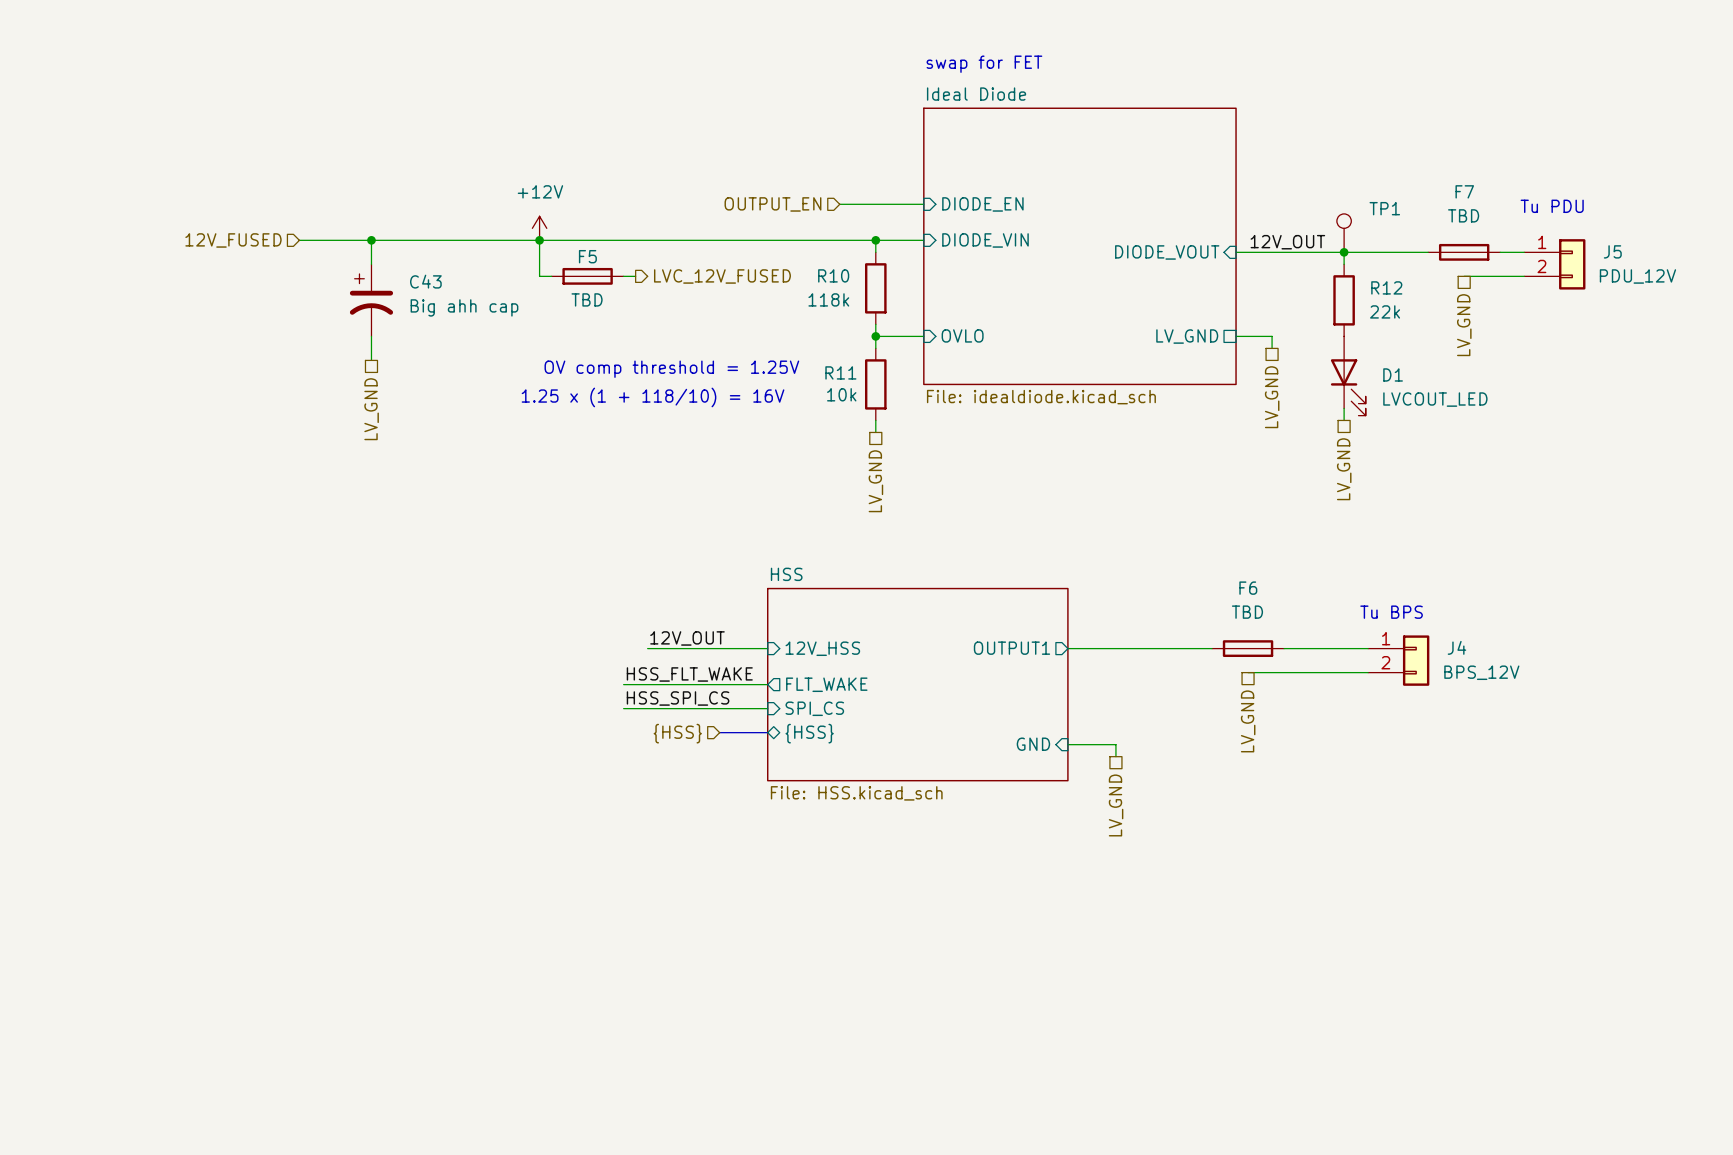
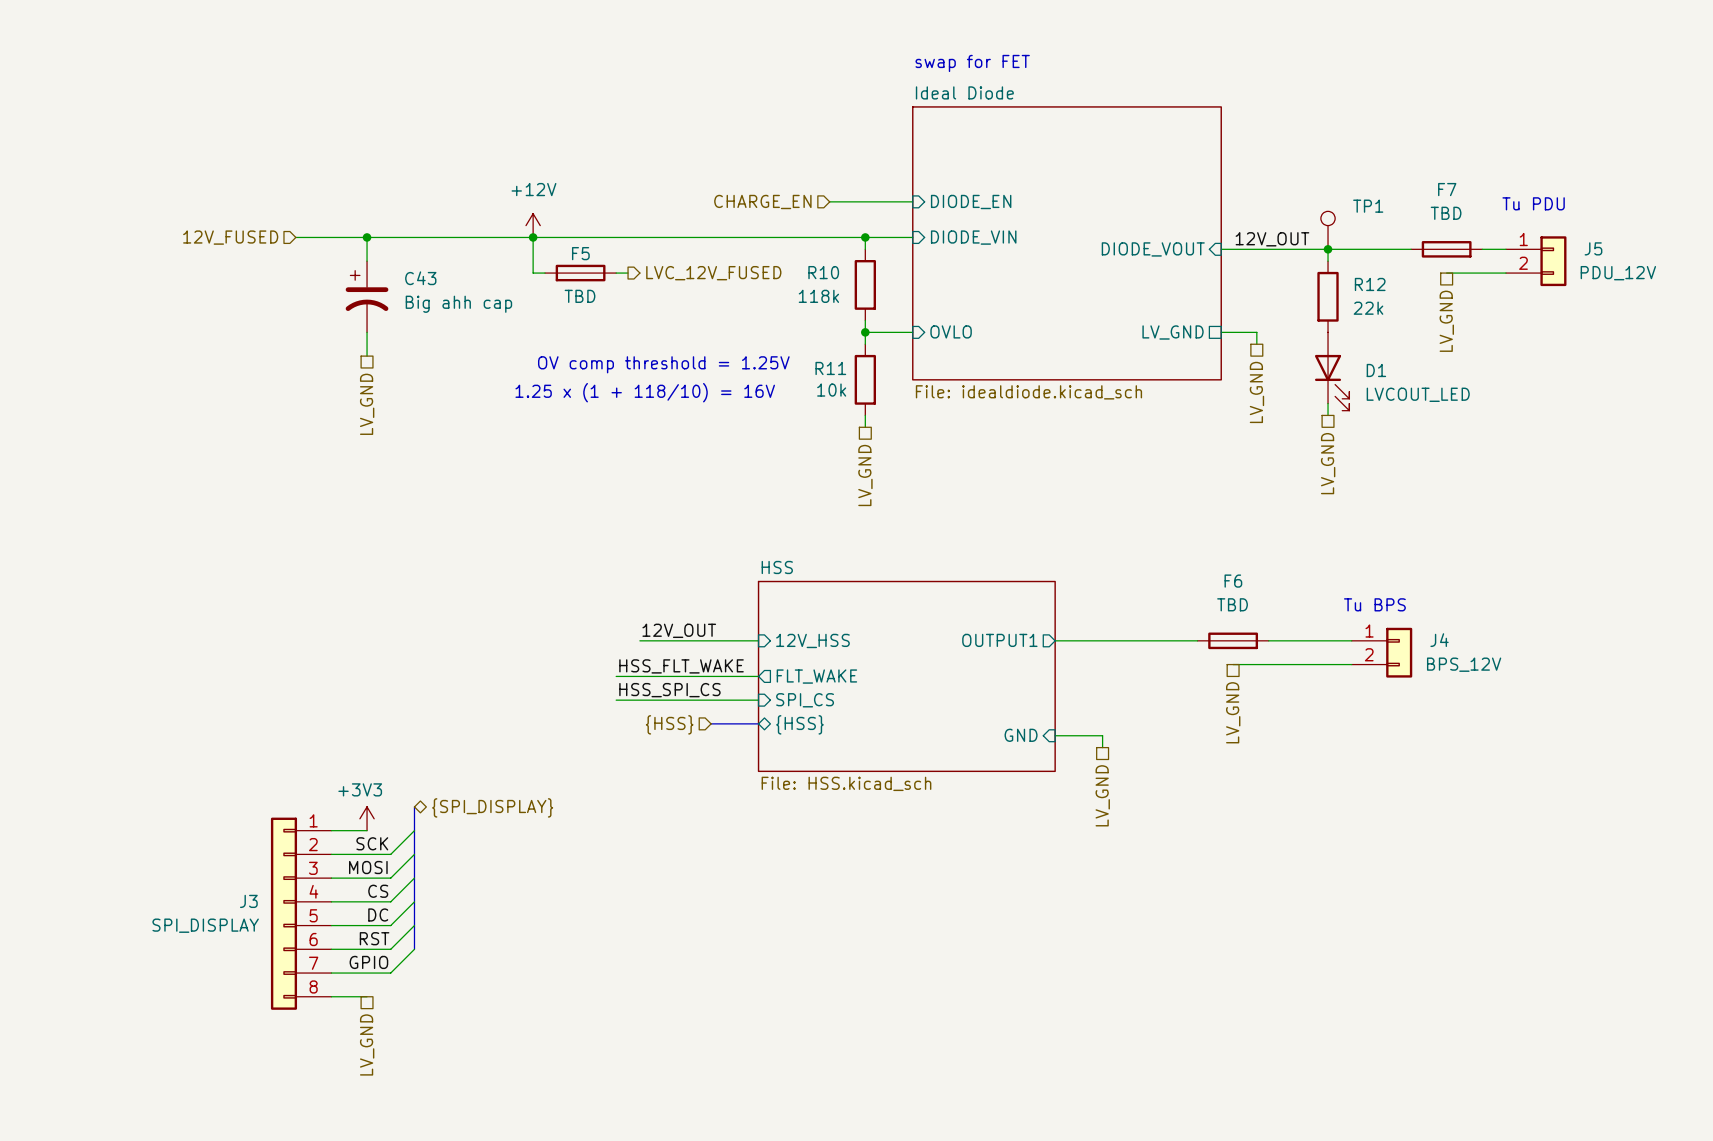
hierarchical label: OUTPUT_EN (772, 204) -> CHARGE_EN (762, 201)
bus: none -> (414, 806) (414, 949)
hierarchical label: none -> {SPI_DISPLAY} (492, 807)
power symbol: none -> +3V3 (367, 818)
wire: none -> (331, 830) (367, 830)
wire: none -> (414, 830) (390, 854) (331, 854)
label: none -> SCK (372, 843)
wire: none -> (414, 854) (390, 878) (331, 878)
label: none -> MOSI (368, 867)
wire: none -> (414, 878) (390, 901) (331, 901)
label: none -> CS (378, 891)
wire: none -> (414, 901) (390, 925) (331, 925)
J3: none -> SPI_DISPLAY (301, 913)
label: none -> DC (378, 914)
wire: none -> (414, 925) (390, 949) (331, 949)
label: none -> RST (374, 938)
wire: none -> (414, 949) (390, 973) (331, 973)
label: none -> GPIO (368, 962)
wire: none -> (331, 996) (367, 996)
hierarchical label: none -> LV_GND (367, 1044)

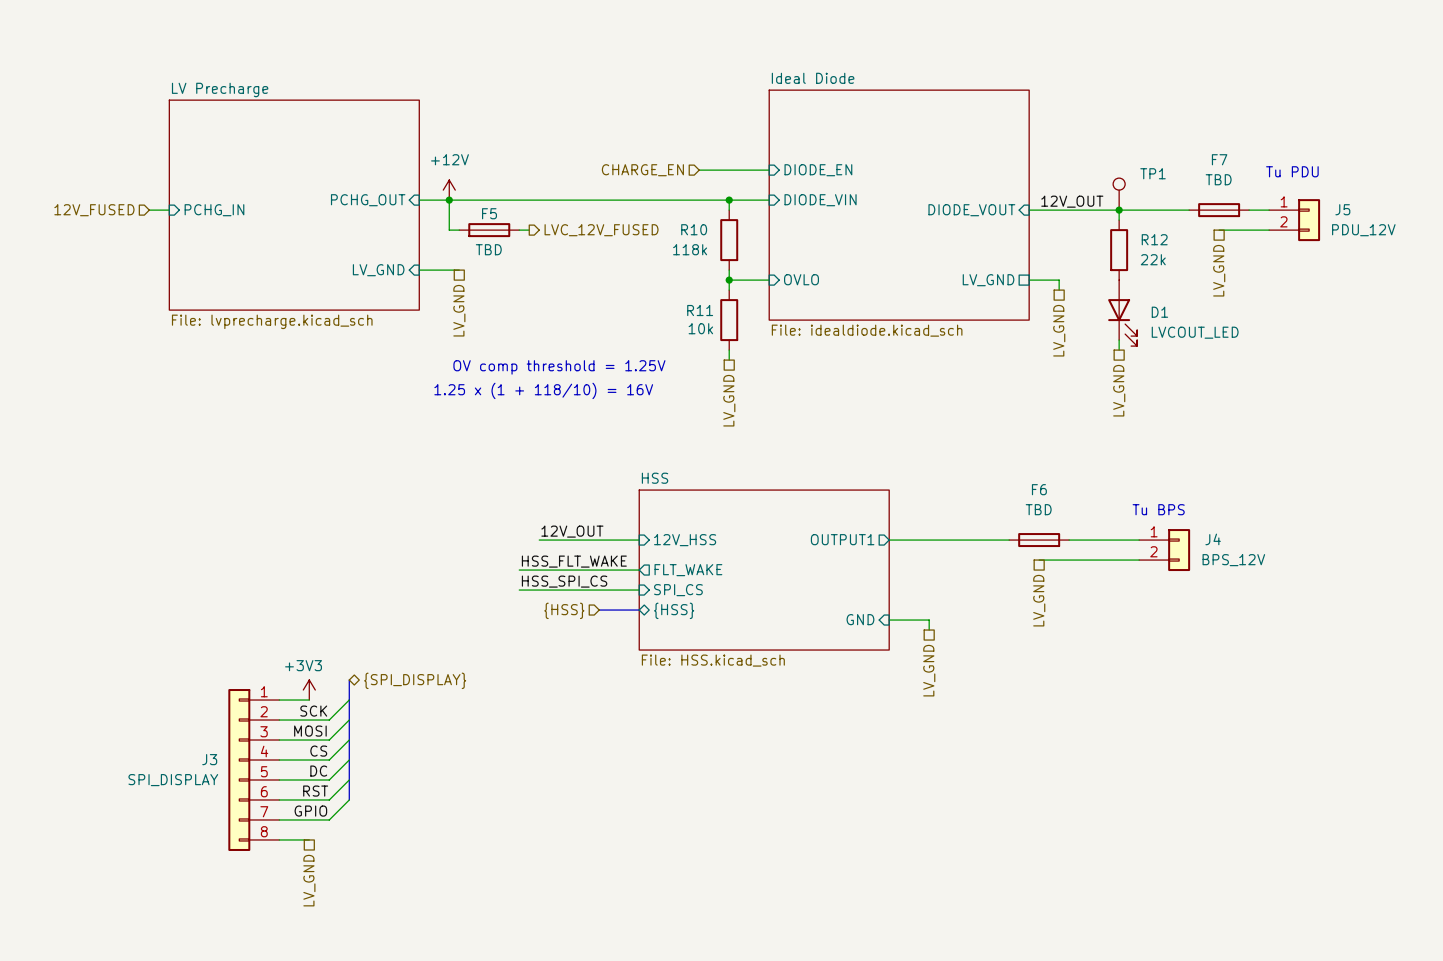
text: swap for FET (972, 63) -> none
hierarchical label position: 12V_FUSED (230, 237) -> 12V_FUSED (94, 210)
wire: (295, 237) (497, 237) -> none
wire: (367, 237) (367, 261) -> none
junction: (367, 237) -> none
sheet pin: none -> PCHG_OUT (368, 200)
sheet LV Precharge: none -> File: lvprecharge.kicad_sch (294, 205)
wire: none -> (149, 210) (169, 210)
sheet pin: none -> PCHG_IN (214, 210)
C43: Big ahh cap (367, 296) -> none
sheet pin: none -> LV_GND (378, 270)
wire: none -> (419, 270) (459, 270)
wire: (367, 332) (367, 356) -> none
text position: OV comp threshold = 1.25V (663, 364) -> OV comp threshold = 1.25V (559, 367)
text position: 1.25 x (1 + 118/10) = 16V (645, 392) -> 1.25 x (1 + 118/10) = 16V (543, 390)
hierarchical label position: LV_GND (367, 404) -> LV_GND (459, 310)

